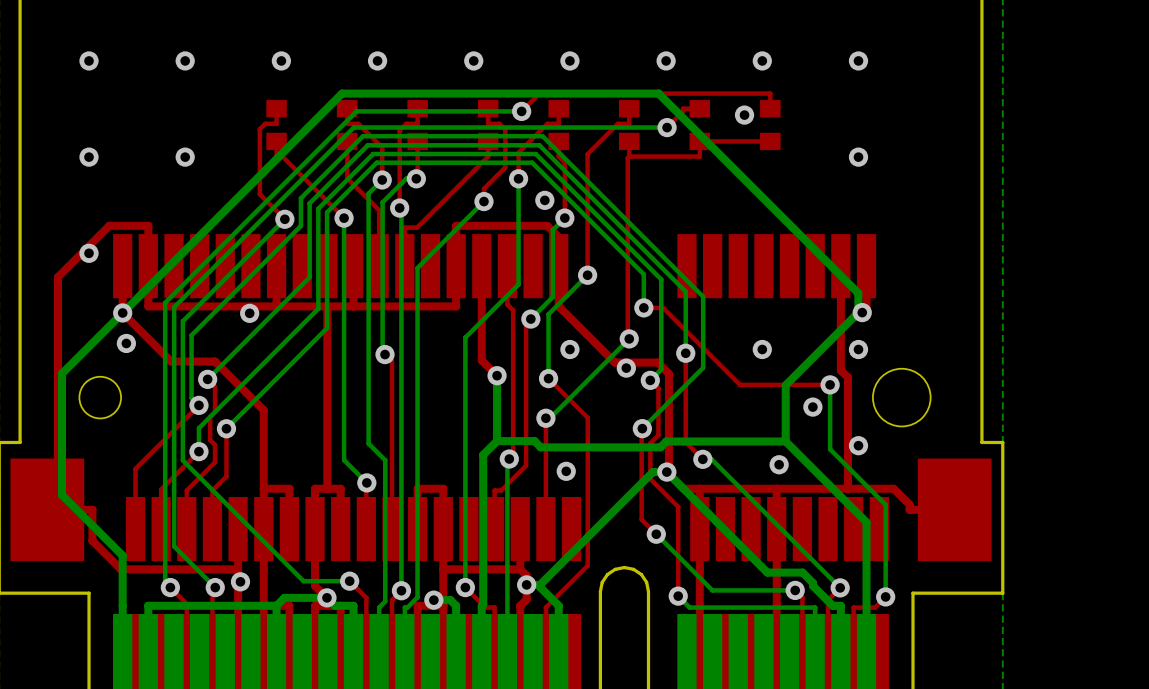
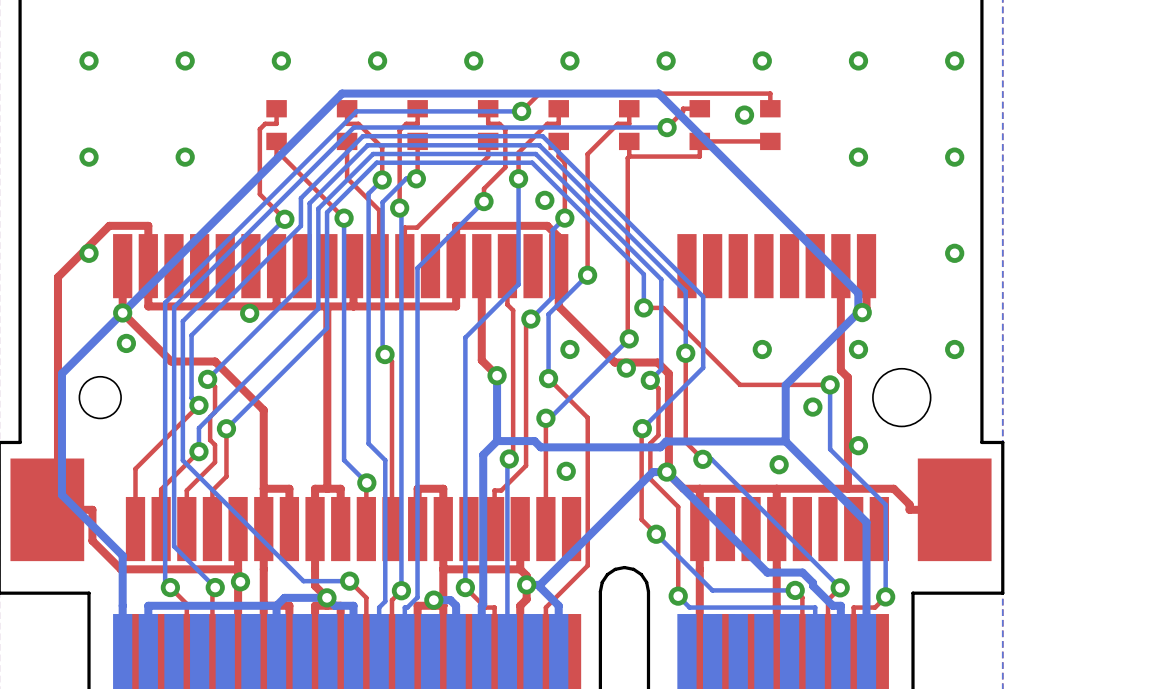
via: none -> (954, 60)
via: none -> (954, 157)
via: none -> (954, 253)
via: none -> (954, 349)

